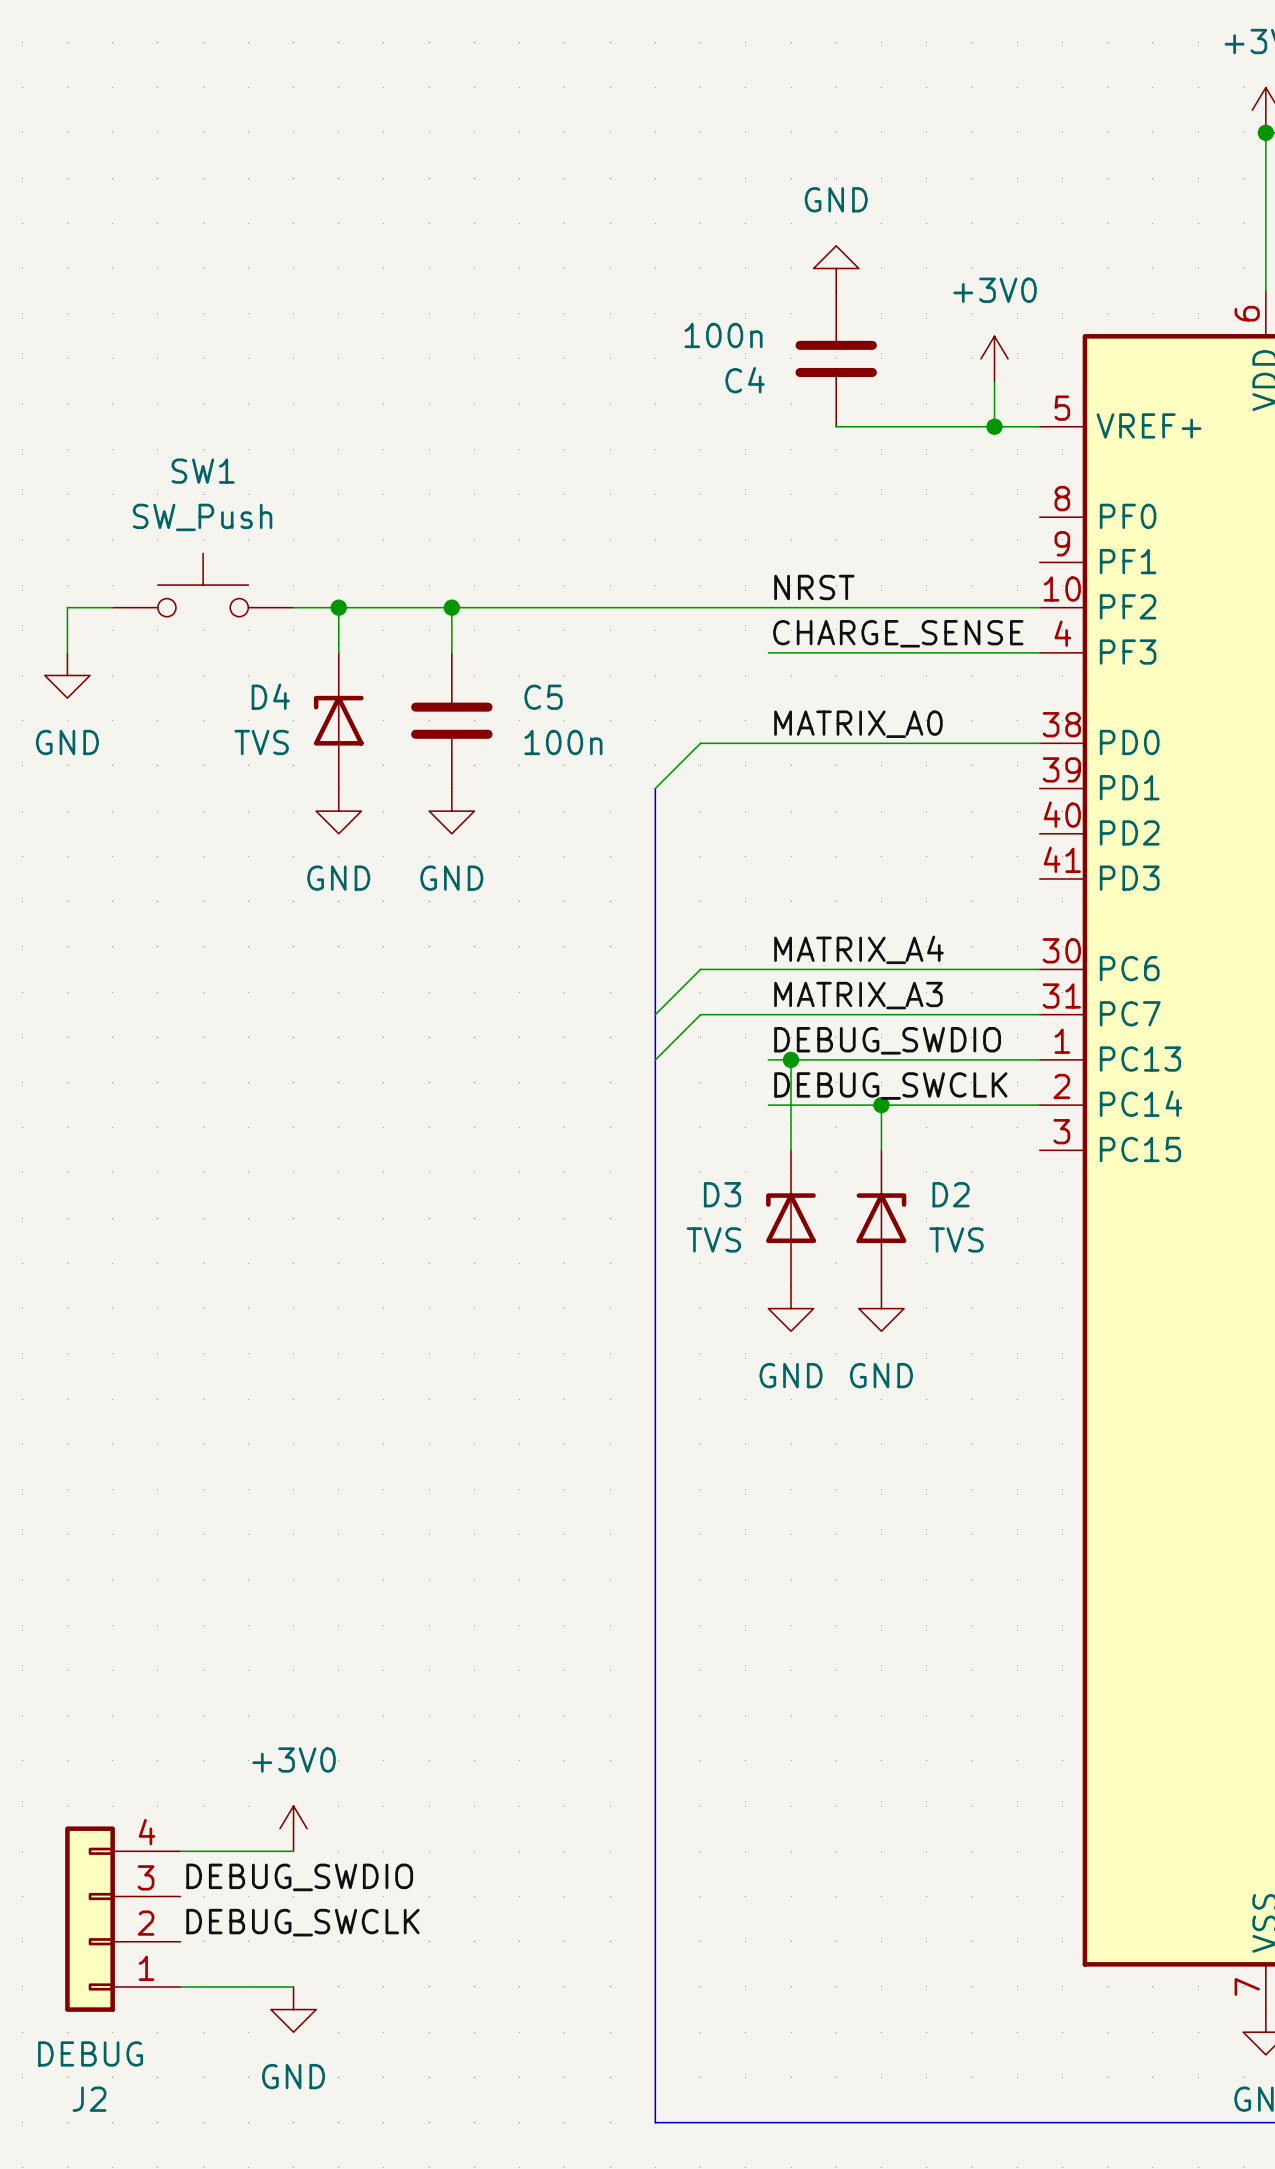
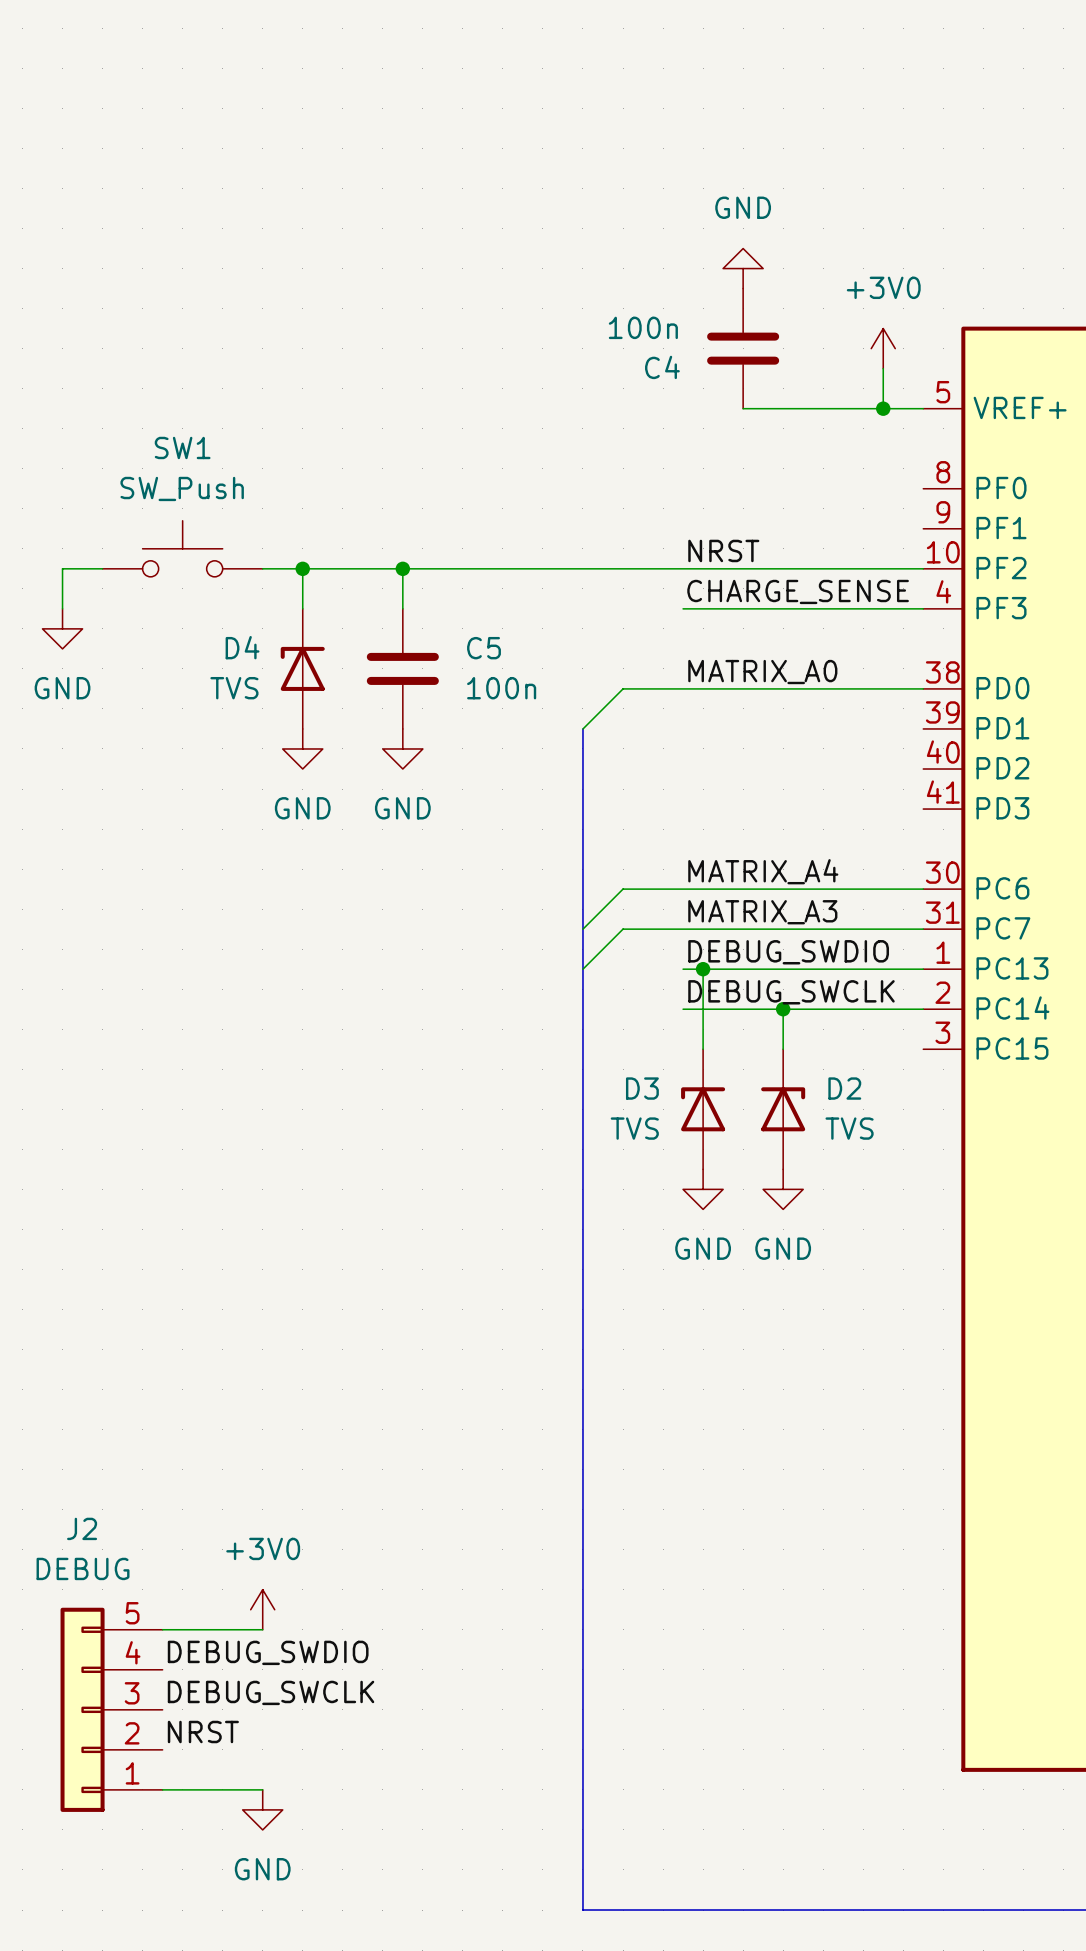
J2 symbol: [65, 1826, 181, 2012] -> [60, 1607, 163, 1812]
power symbol position: +3V0 (293, 1828) -> +3V0 (262, 1609)
label: none -> DEBUG_SWDIO (268, 1652)
wire: (180, 1851) (293, 1851) -> (162, 1629) (262, 1629)
label: DEBUG_SWDIO (299, 1877) -> DEBUG_SWCLK (271, 1692)
label: DEBUG_SWCLK (302, 1922) -> NRST (203, 1732)
J2 value position: DEBUG (90, 2053) -> DEBUG (83, 1568)
J2 name position: J2 (89, 2099) -> J2 (82, 1528)

